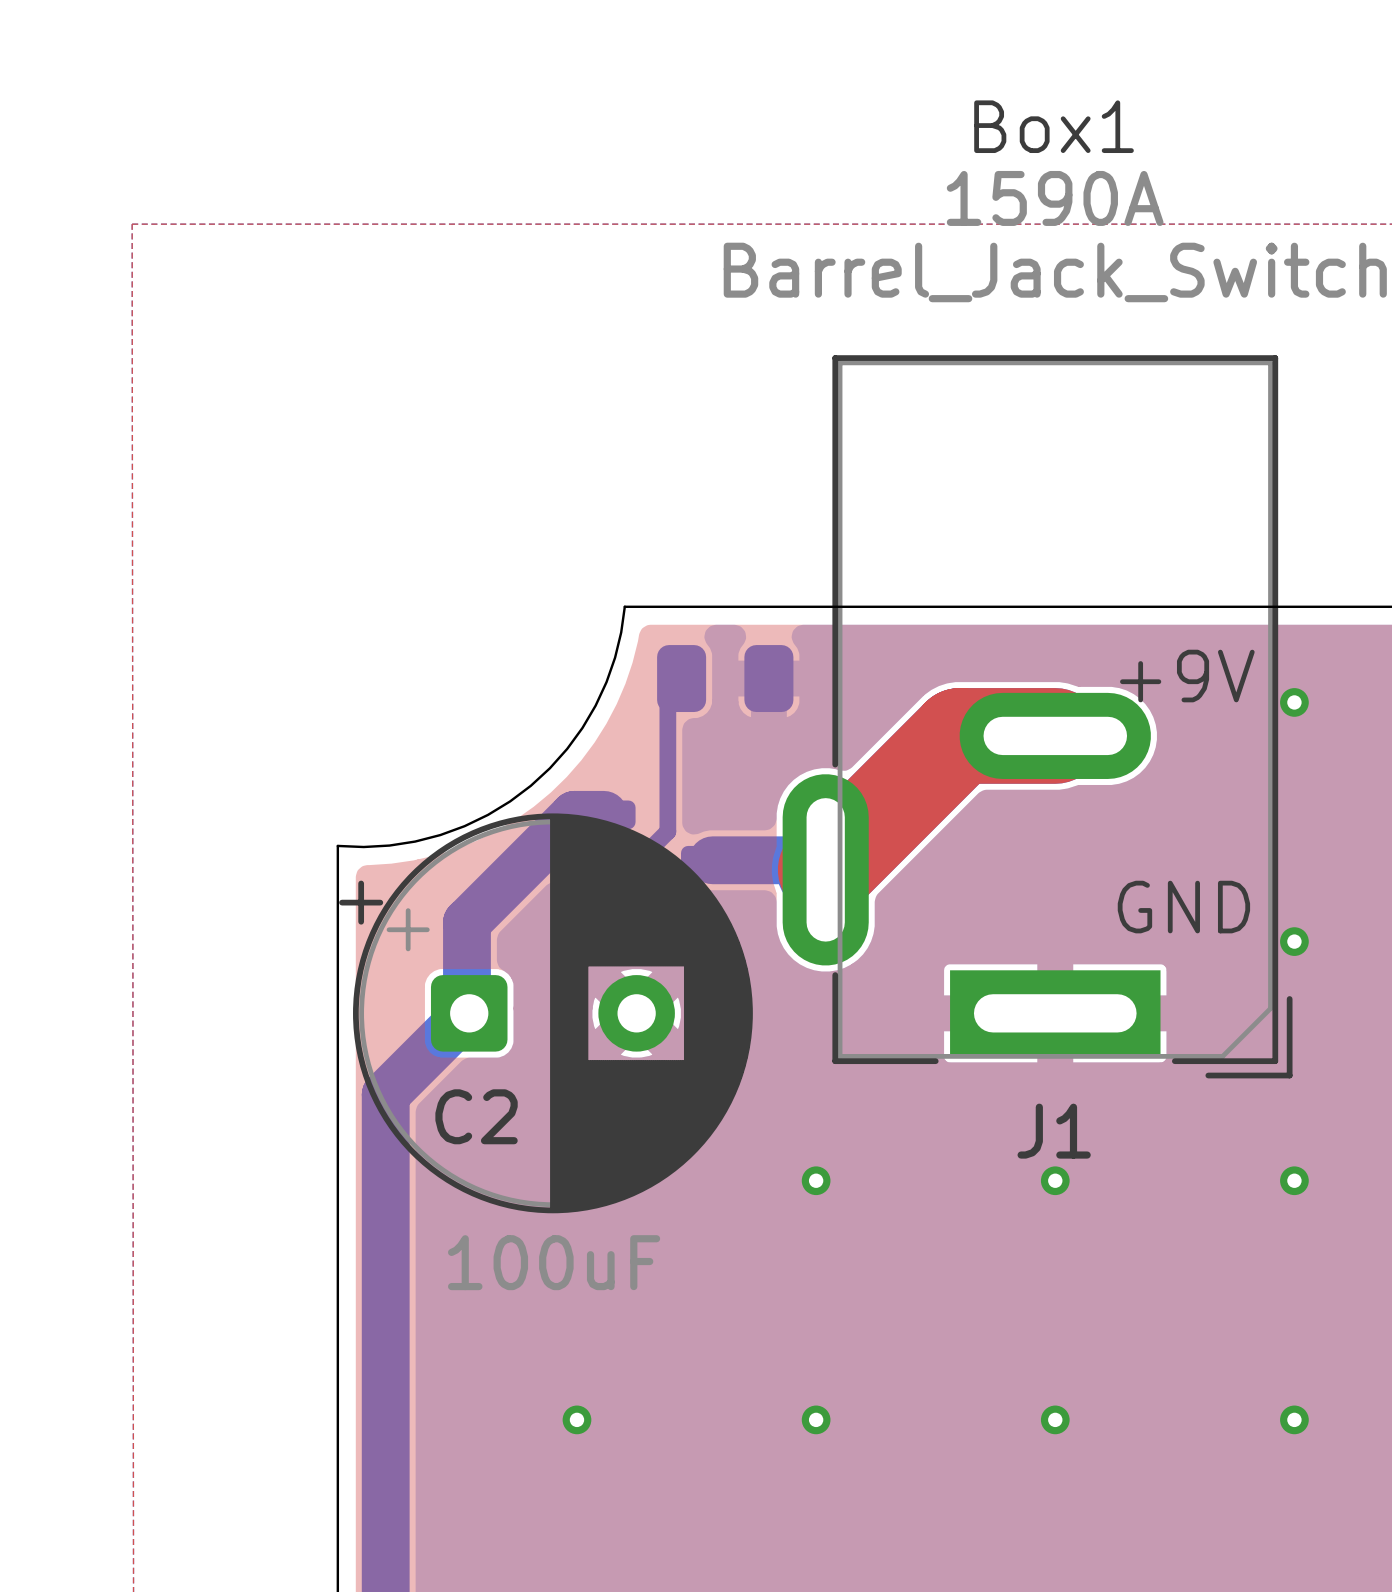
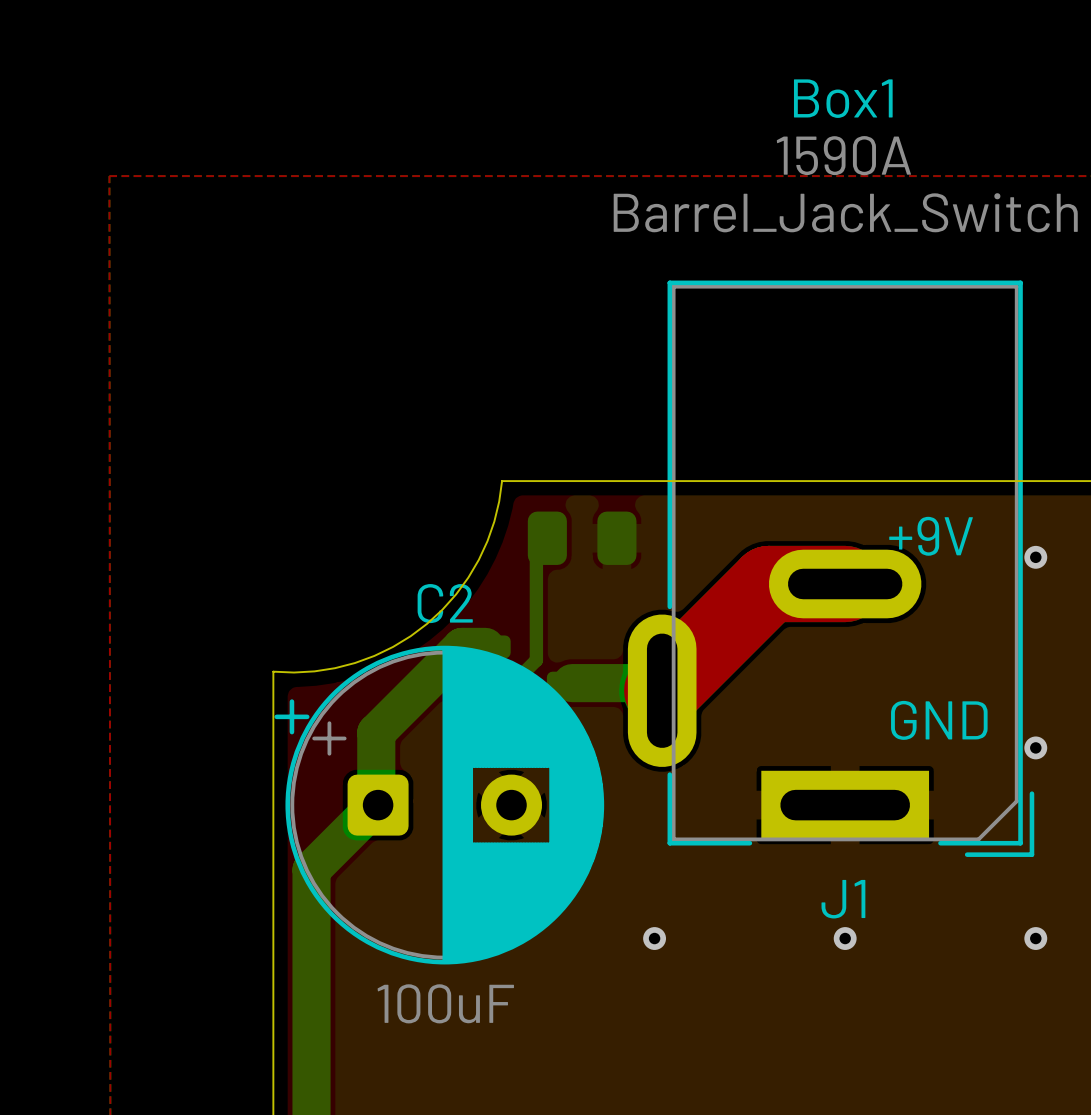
C2 name position: C2 (476, 1116) -> C2 (445, 603)

